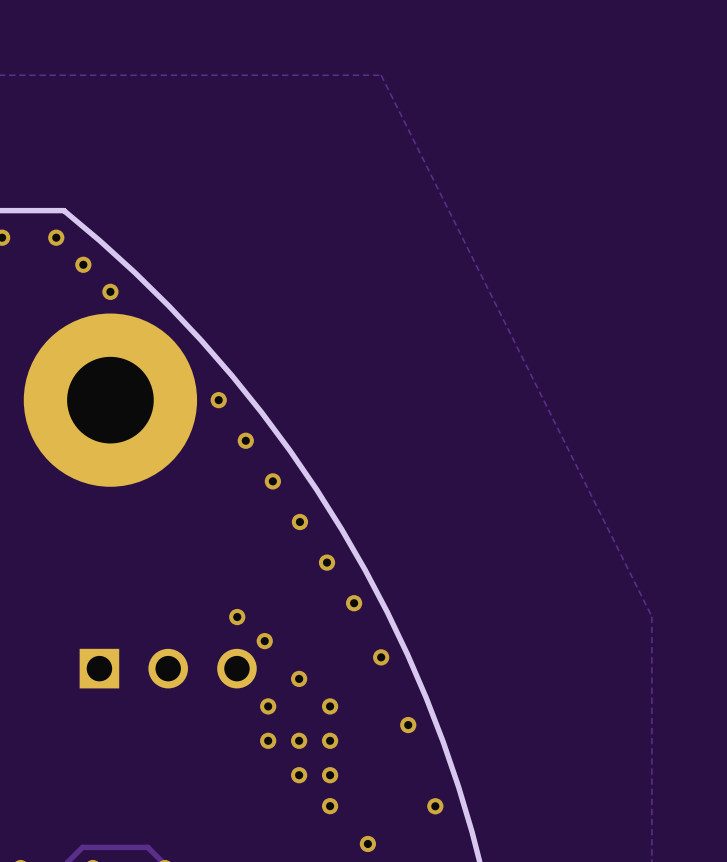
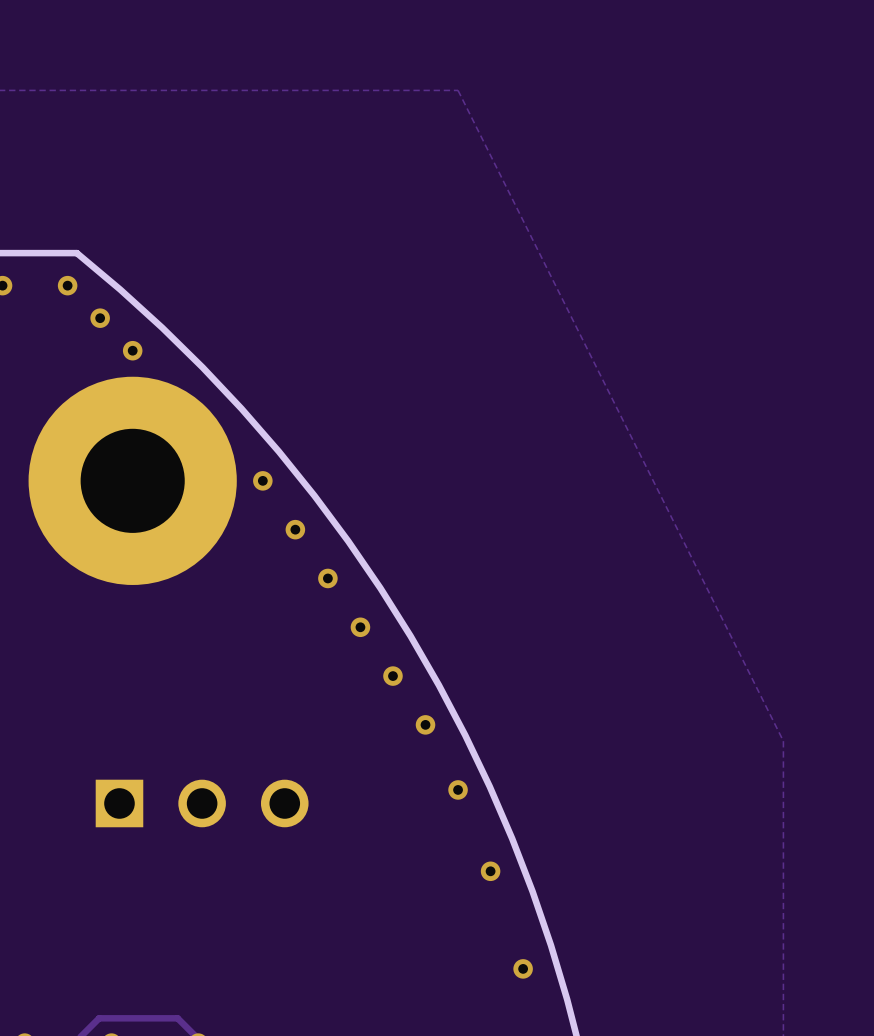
via: (237, 617) -> none
via: (264, 641) -> none
via: (299, 678) -> none
via: (268, 706) -> none
via: (330, 706) -> none
via: (268, 740) -> none
via: (299, 740) -> none
via: (330, 740) -> none
via: (299, 775) -> none
via: (330, 775) -> none
via: (330, 806) -> none
via: (367, 843) -> none

